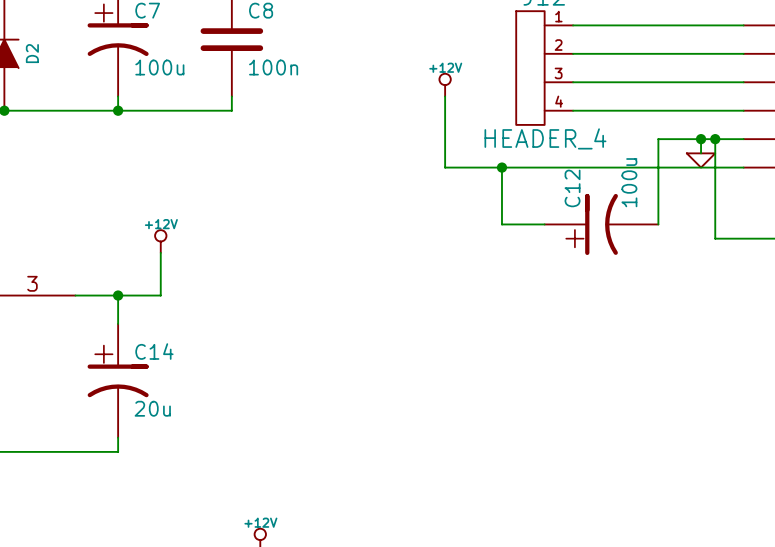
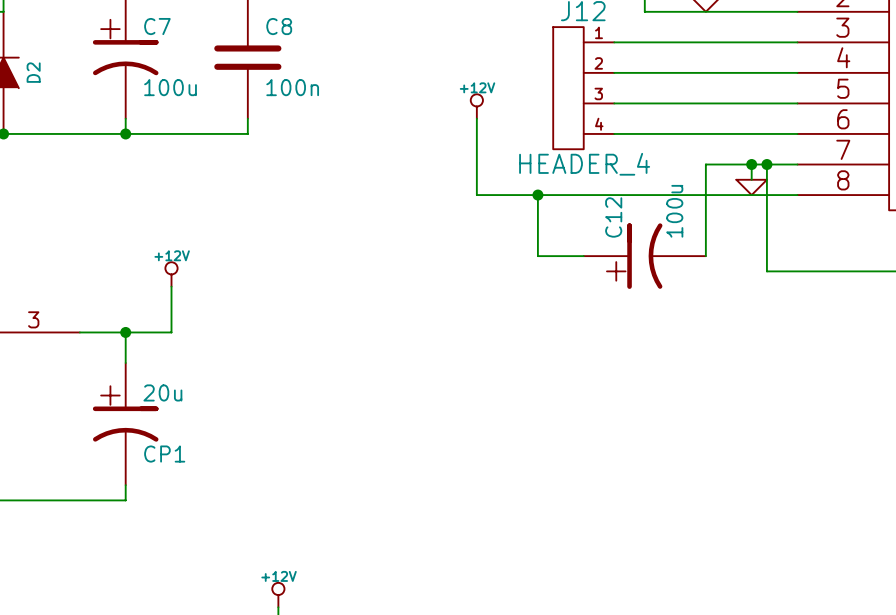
C14 name: C14 (154, 351) -> 20u (162, 392)
C14 value: 20u (152, 408) -> CP1 (164, 454)

